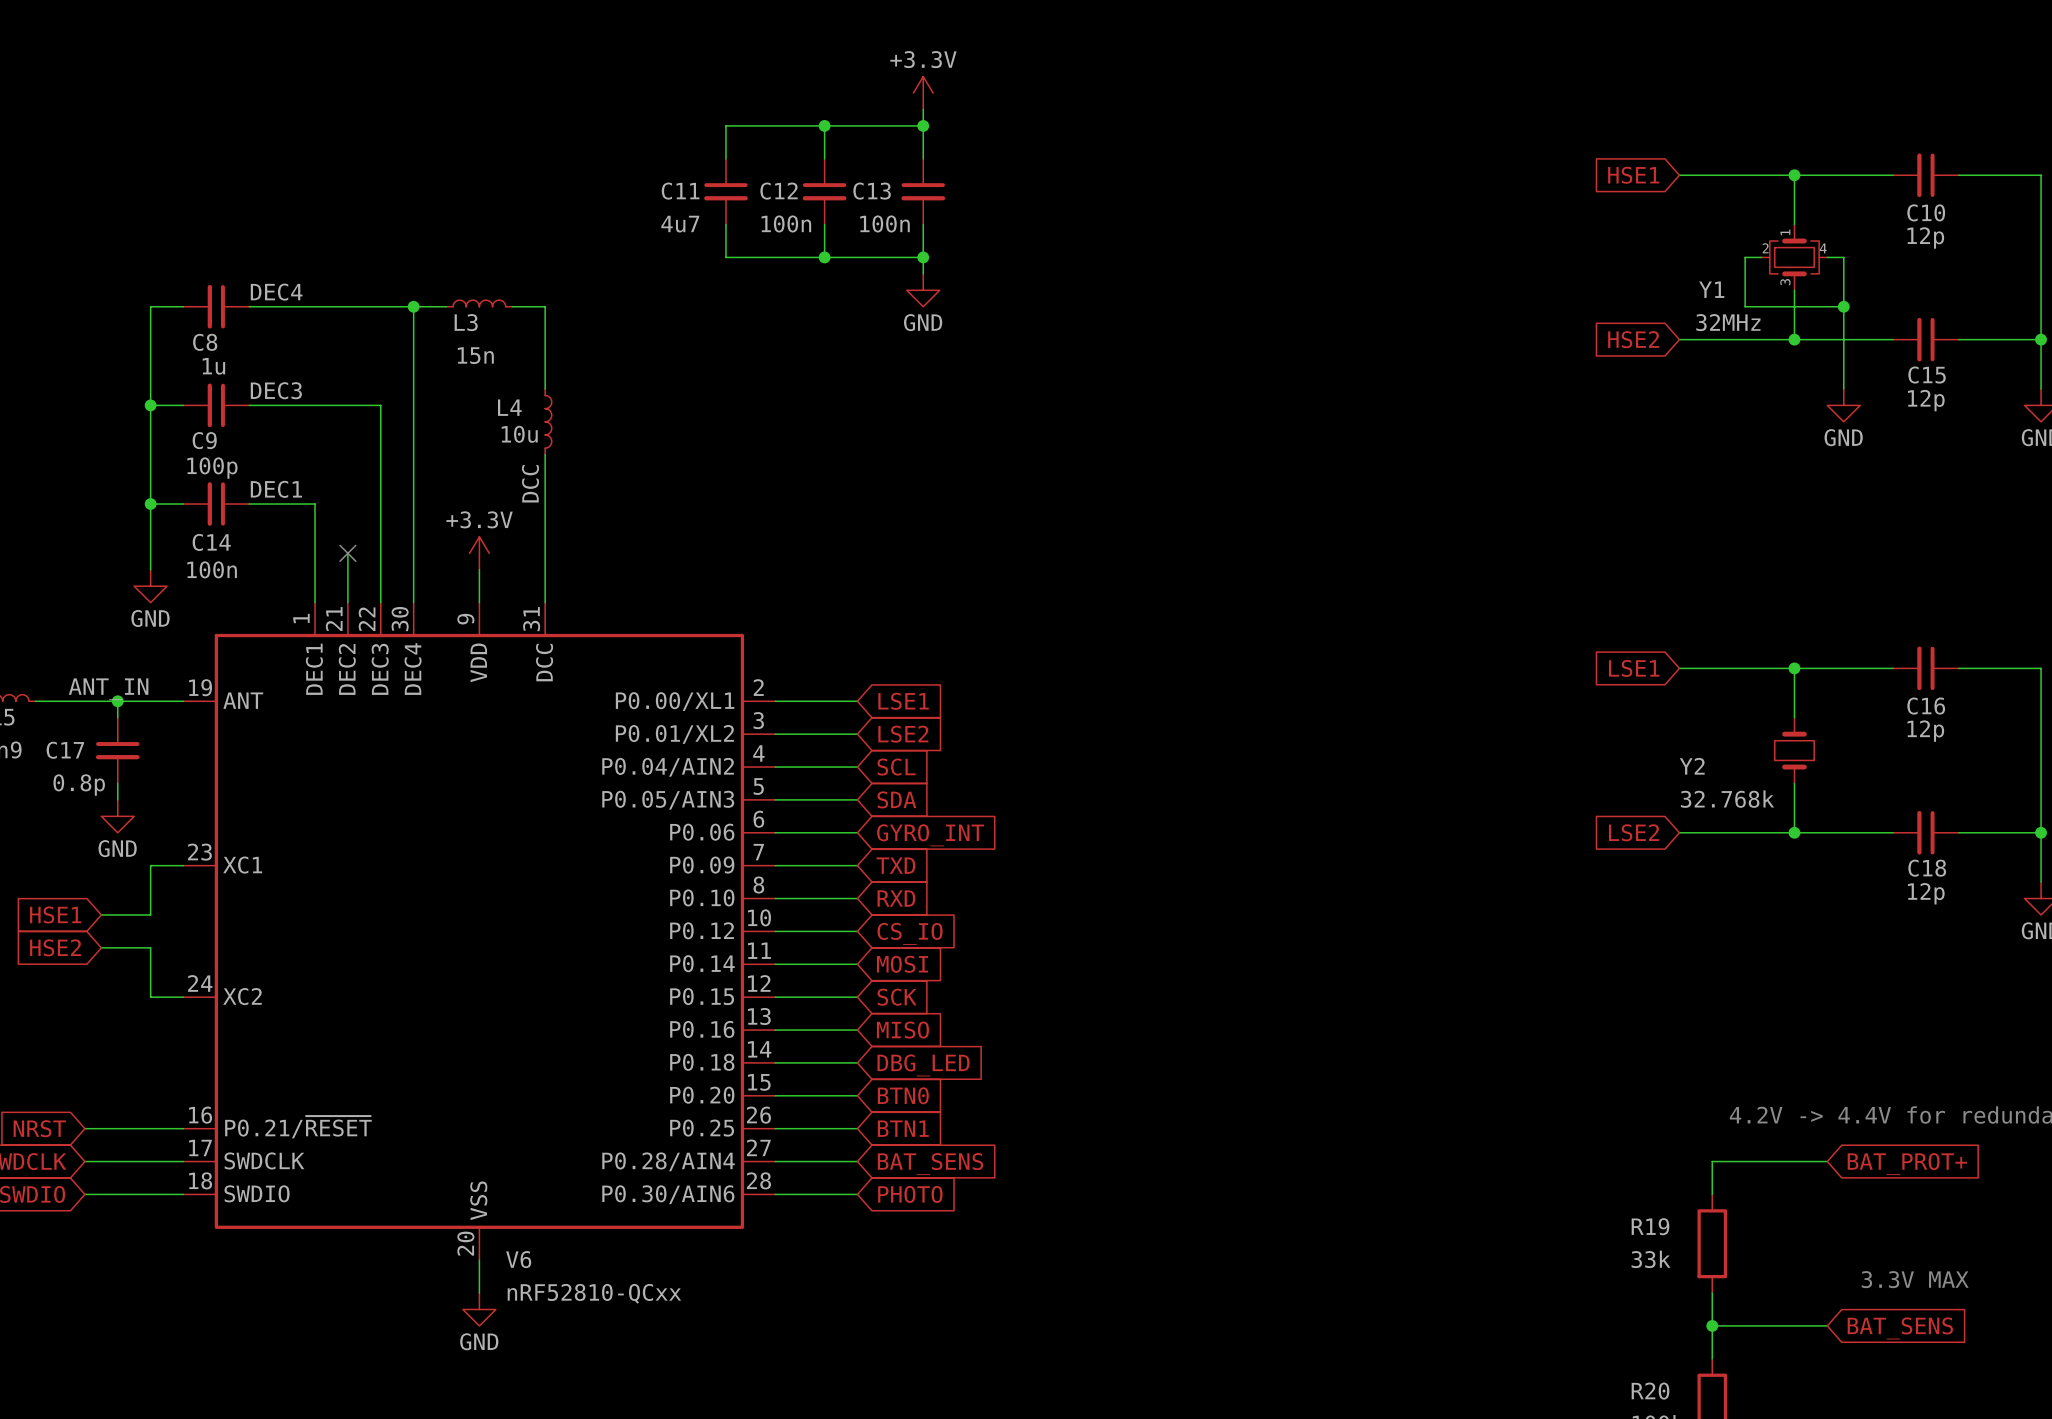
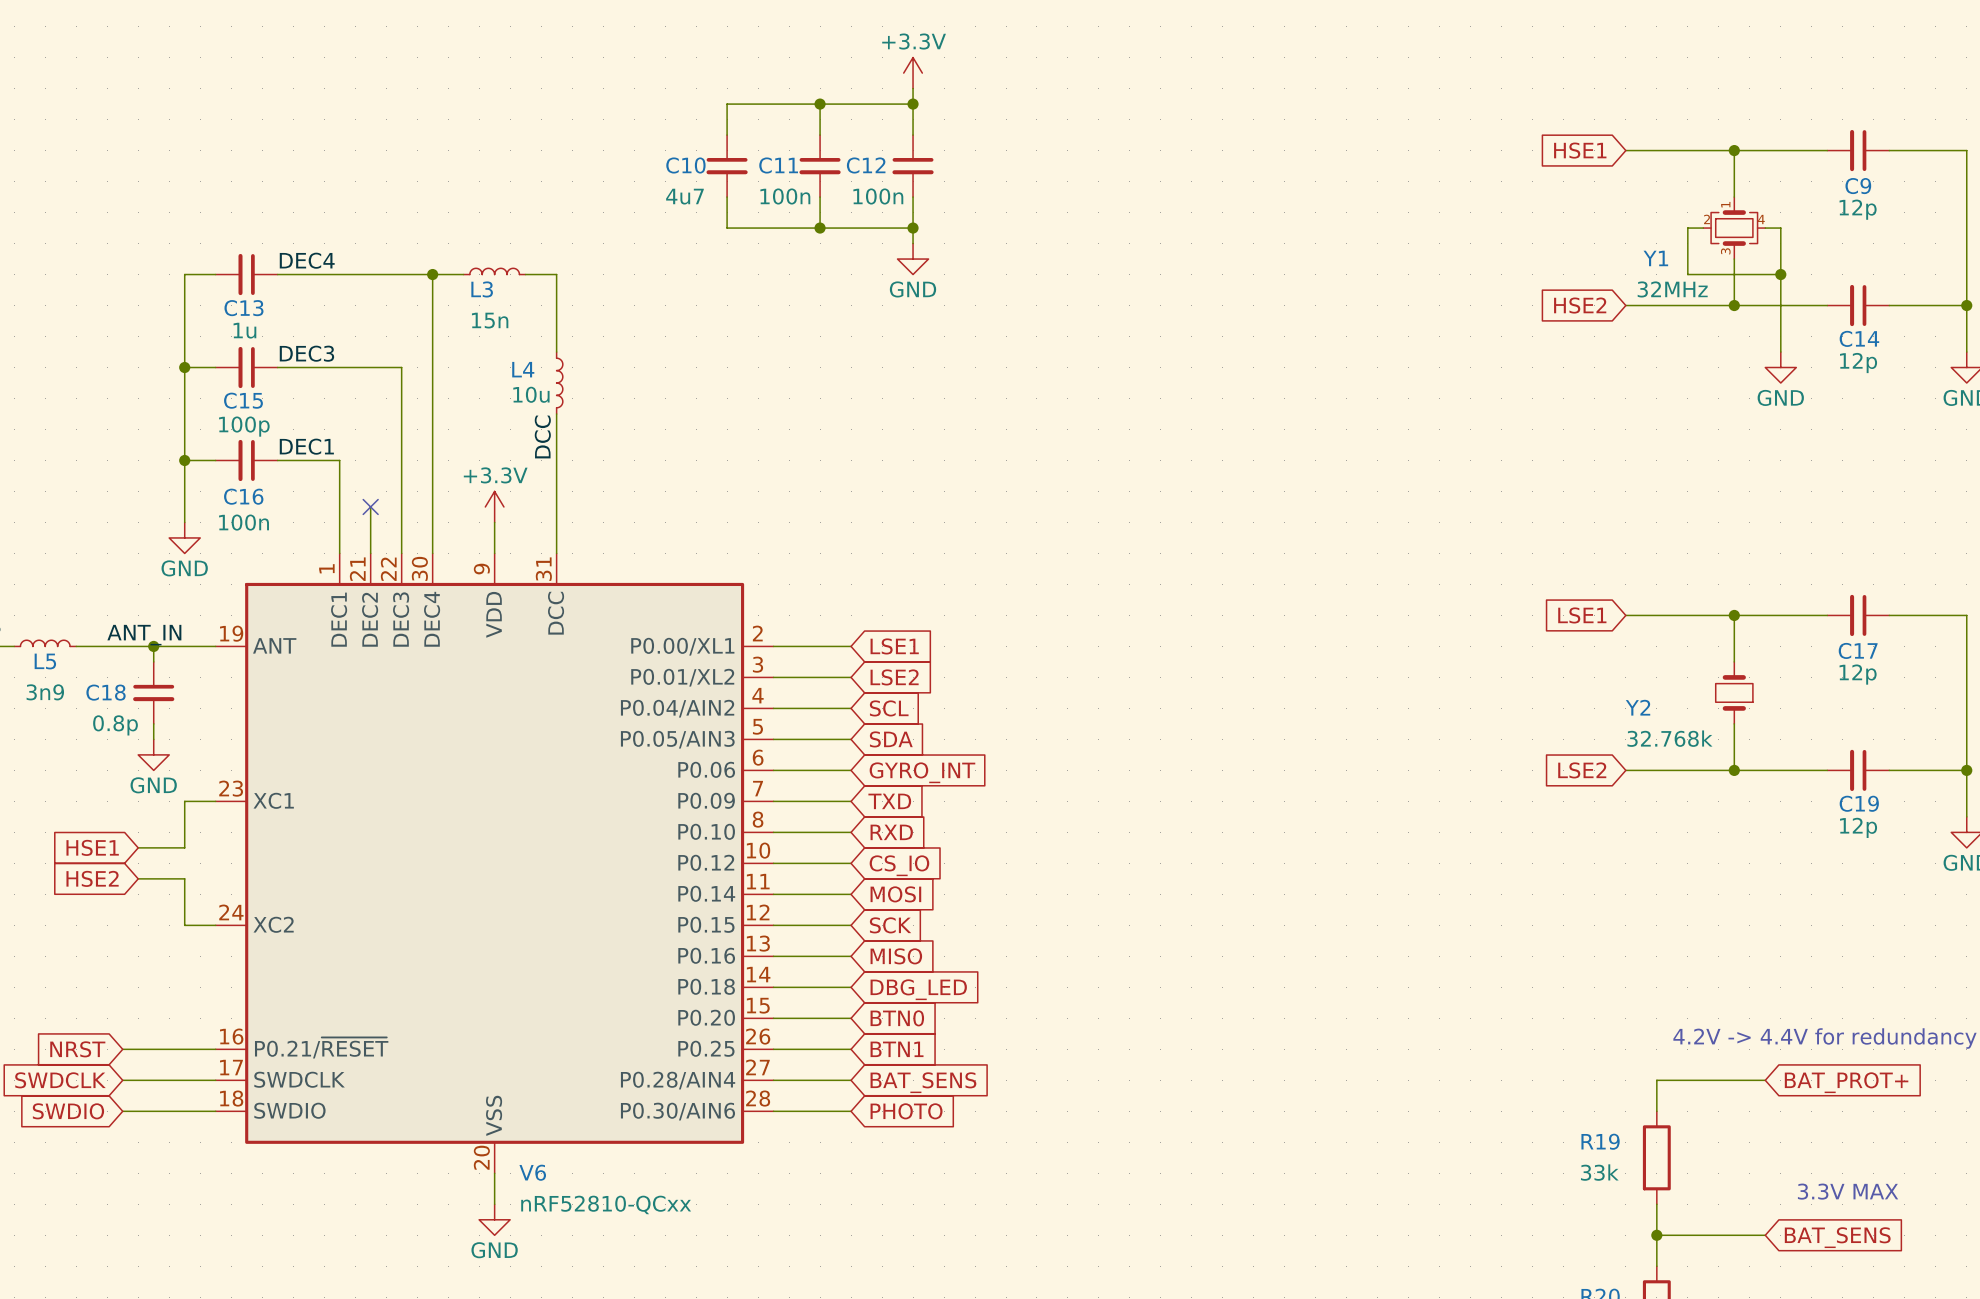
C11 name: C11 (680, 191) -> C10 (685, 165)
C12 name: C12 (779, 191) -> C11 (778, 165)
C13 name: C13 (872, 191) -> C12 (866, 165)
C10 name: C10 (1926, 212) -> C9 (1858, 186)
C8 name: C8 (205, 342) -> C13 (243, 308)
C15 name: C15 (1927, 375) -> C14 (1859, 338)
C9 name: C9 (204, 440) -> C15 (243, 400)
C14 name: C14 (211, 542) -> C16 (243, 496)
C16 name: C16 (1926, 706) -> C17 (1858, 650)
C17 name: C17 (65, 750) -> C18 (106, 692)
C18 name: C18 (1927, 868) -> C19 (1859, 803)

